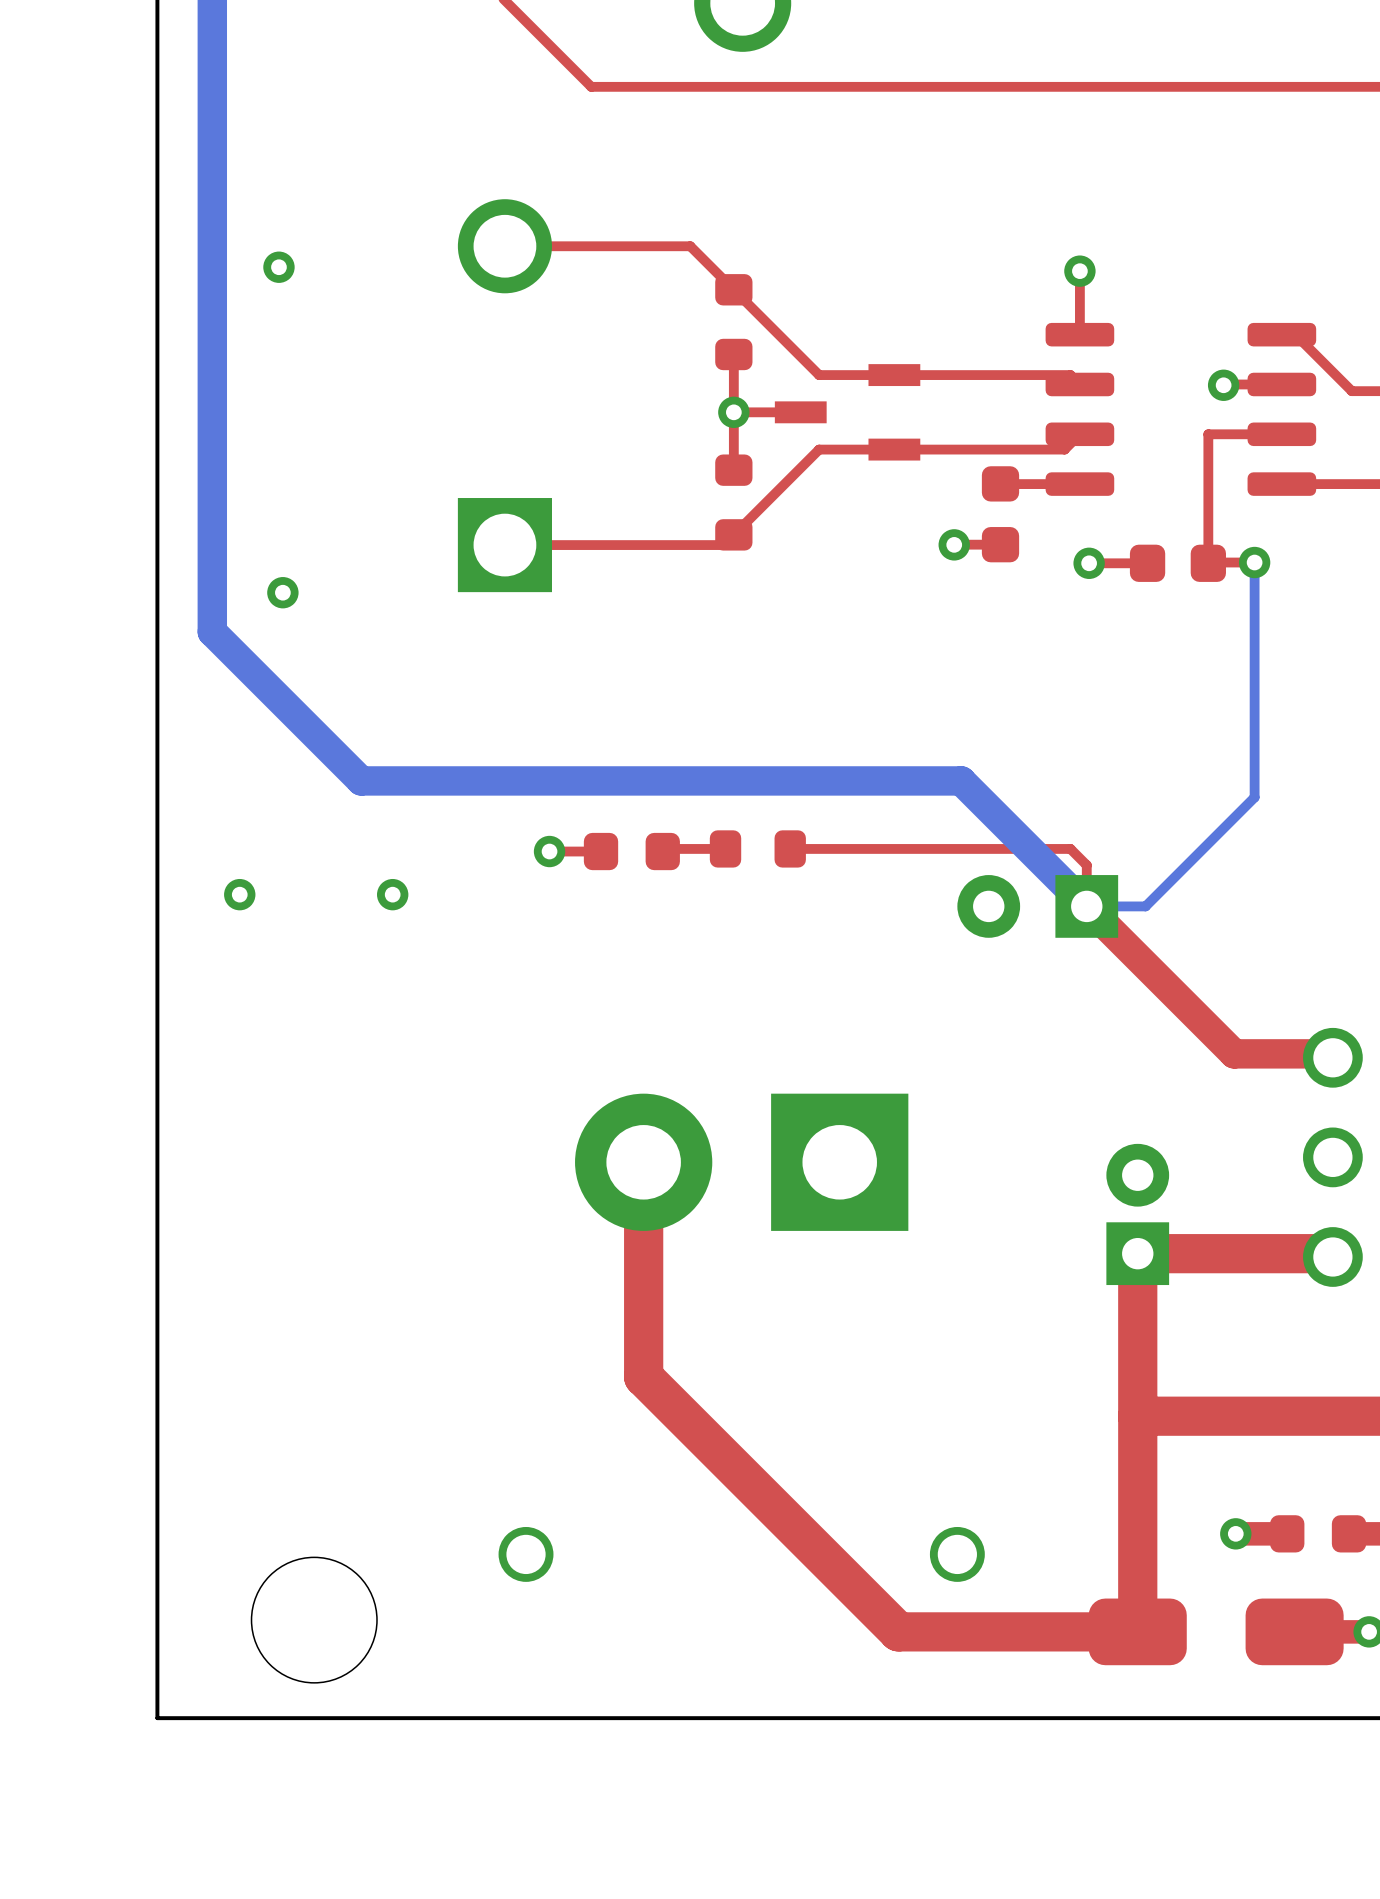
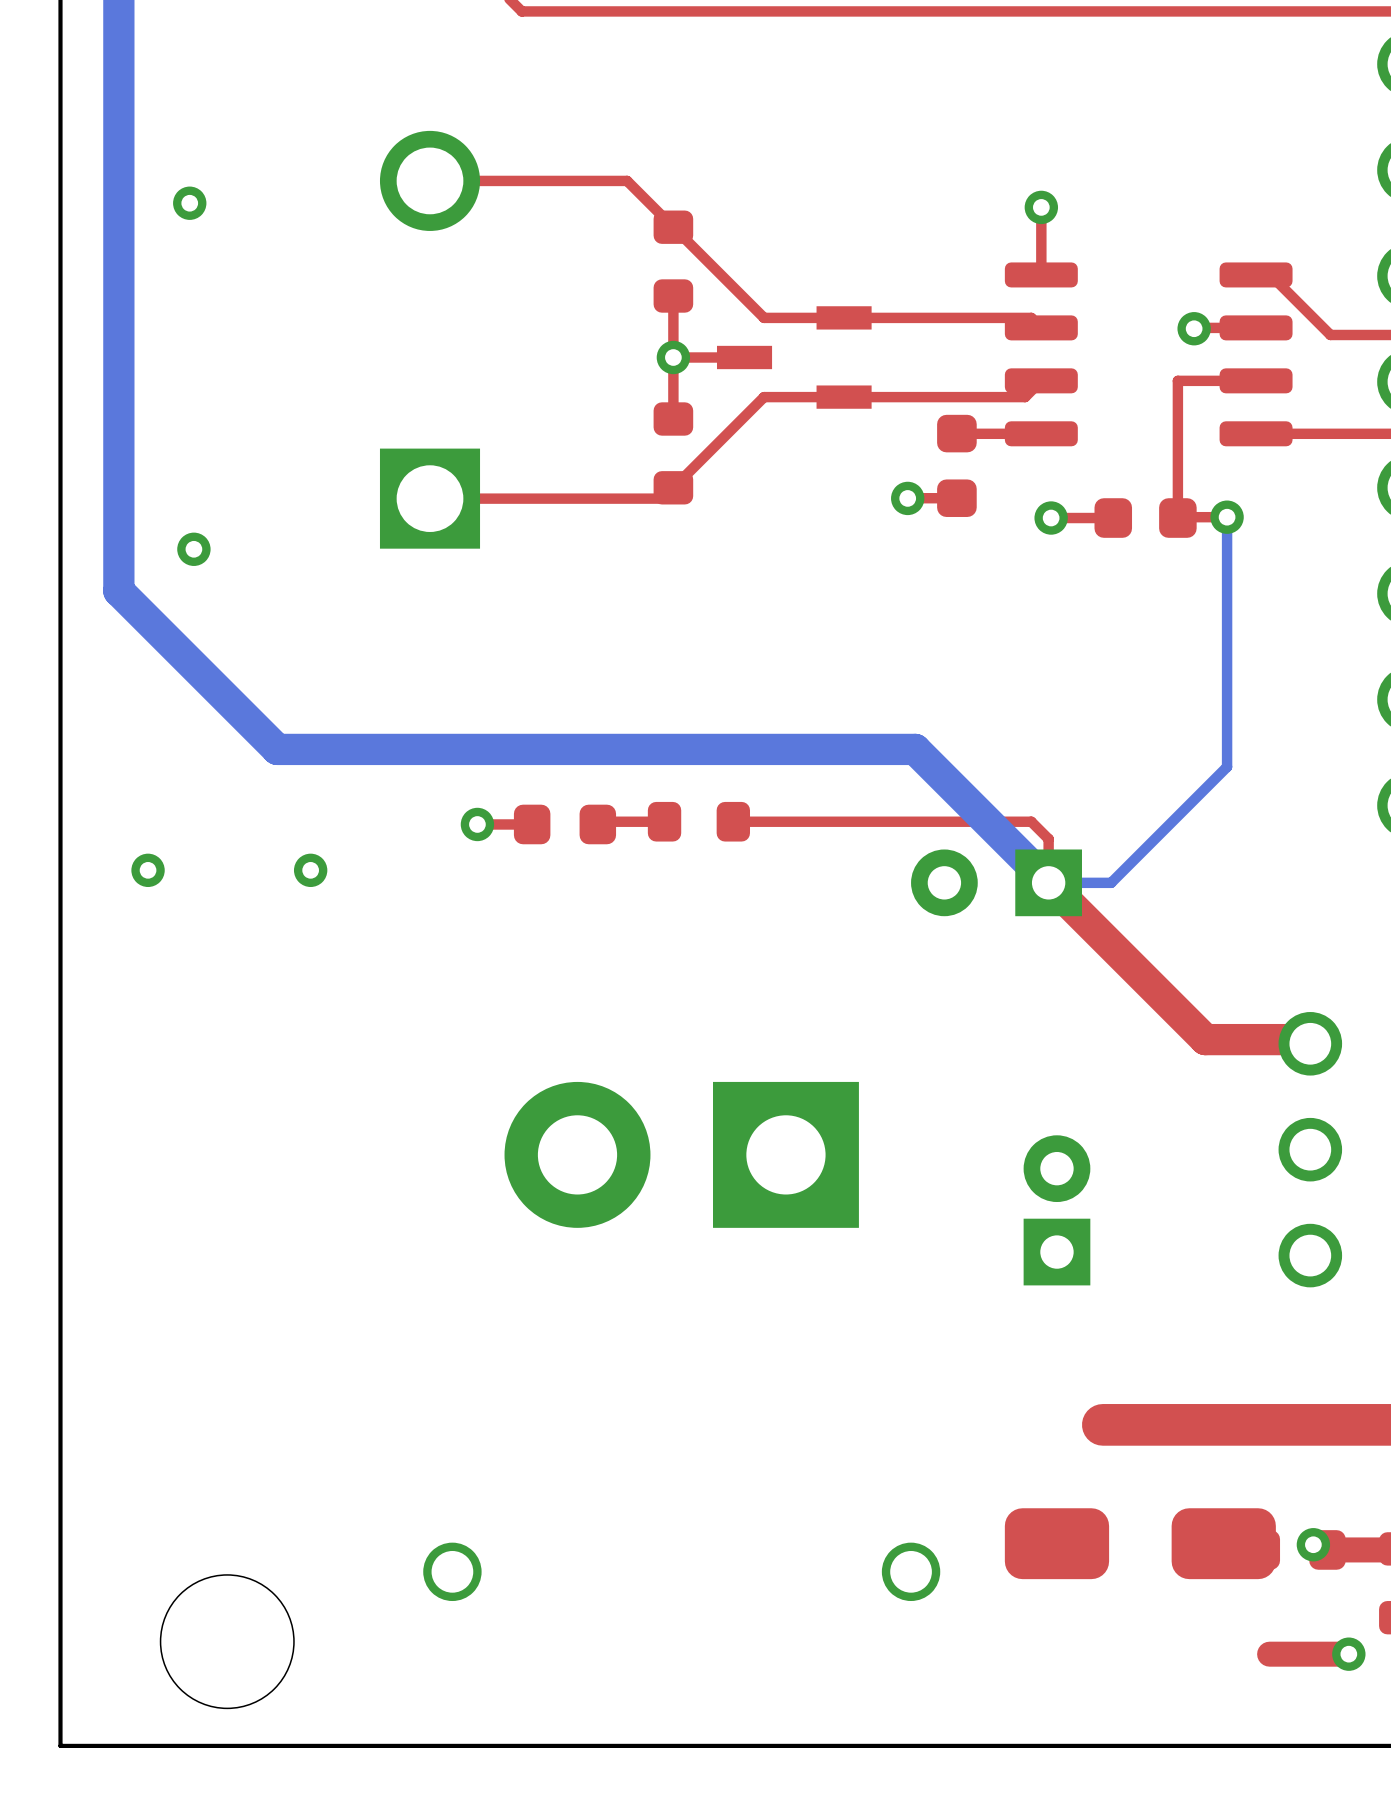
top track: (643, 1162) (643, 1376) (898, 1631) (1137, 1631) (1137, 1253) (1329, 1253) (1332, 1256) -> none
part position: (1137, 1214) -> (1056, 1210)
via position: (1235, 1533) -> (1313, 1544)
part position: (1216, 1631) -> (1140, 1543)

